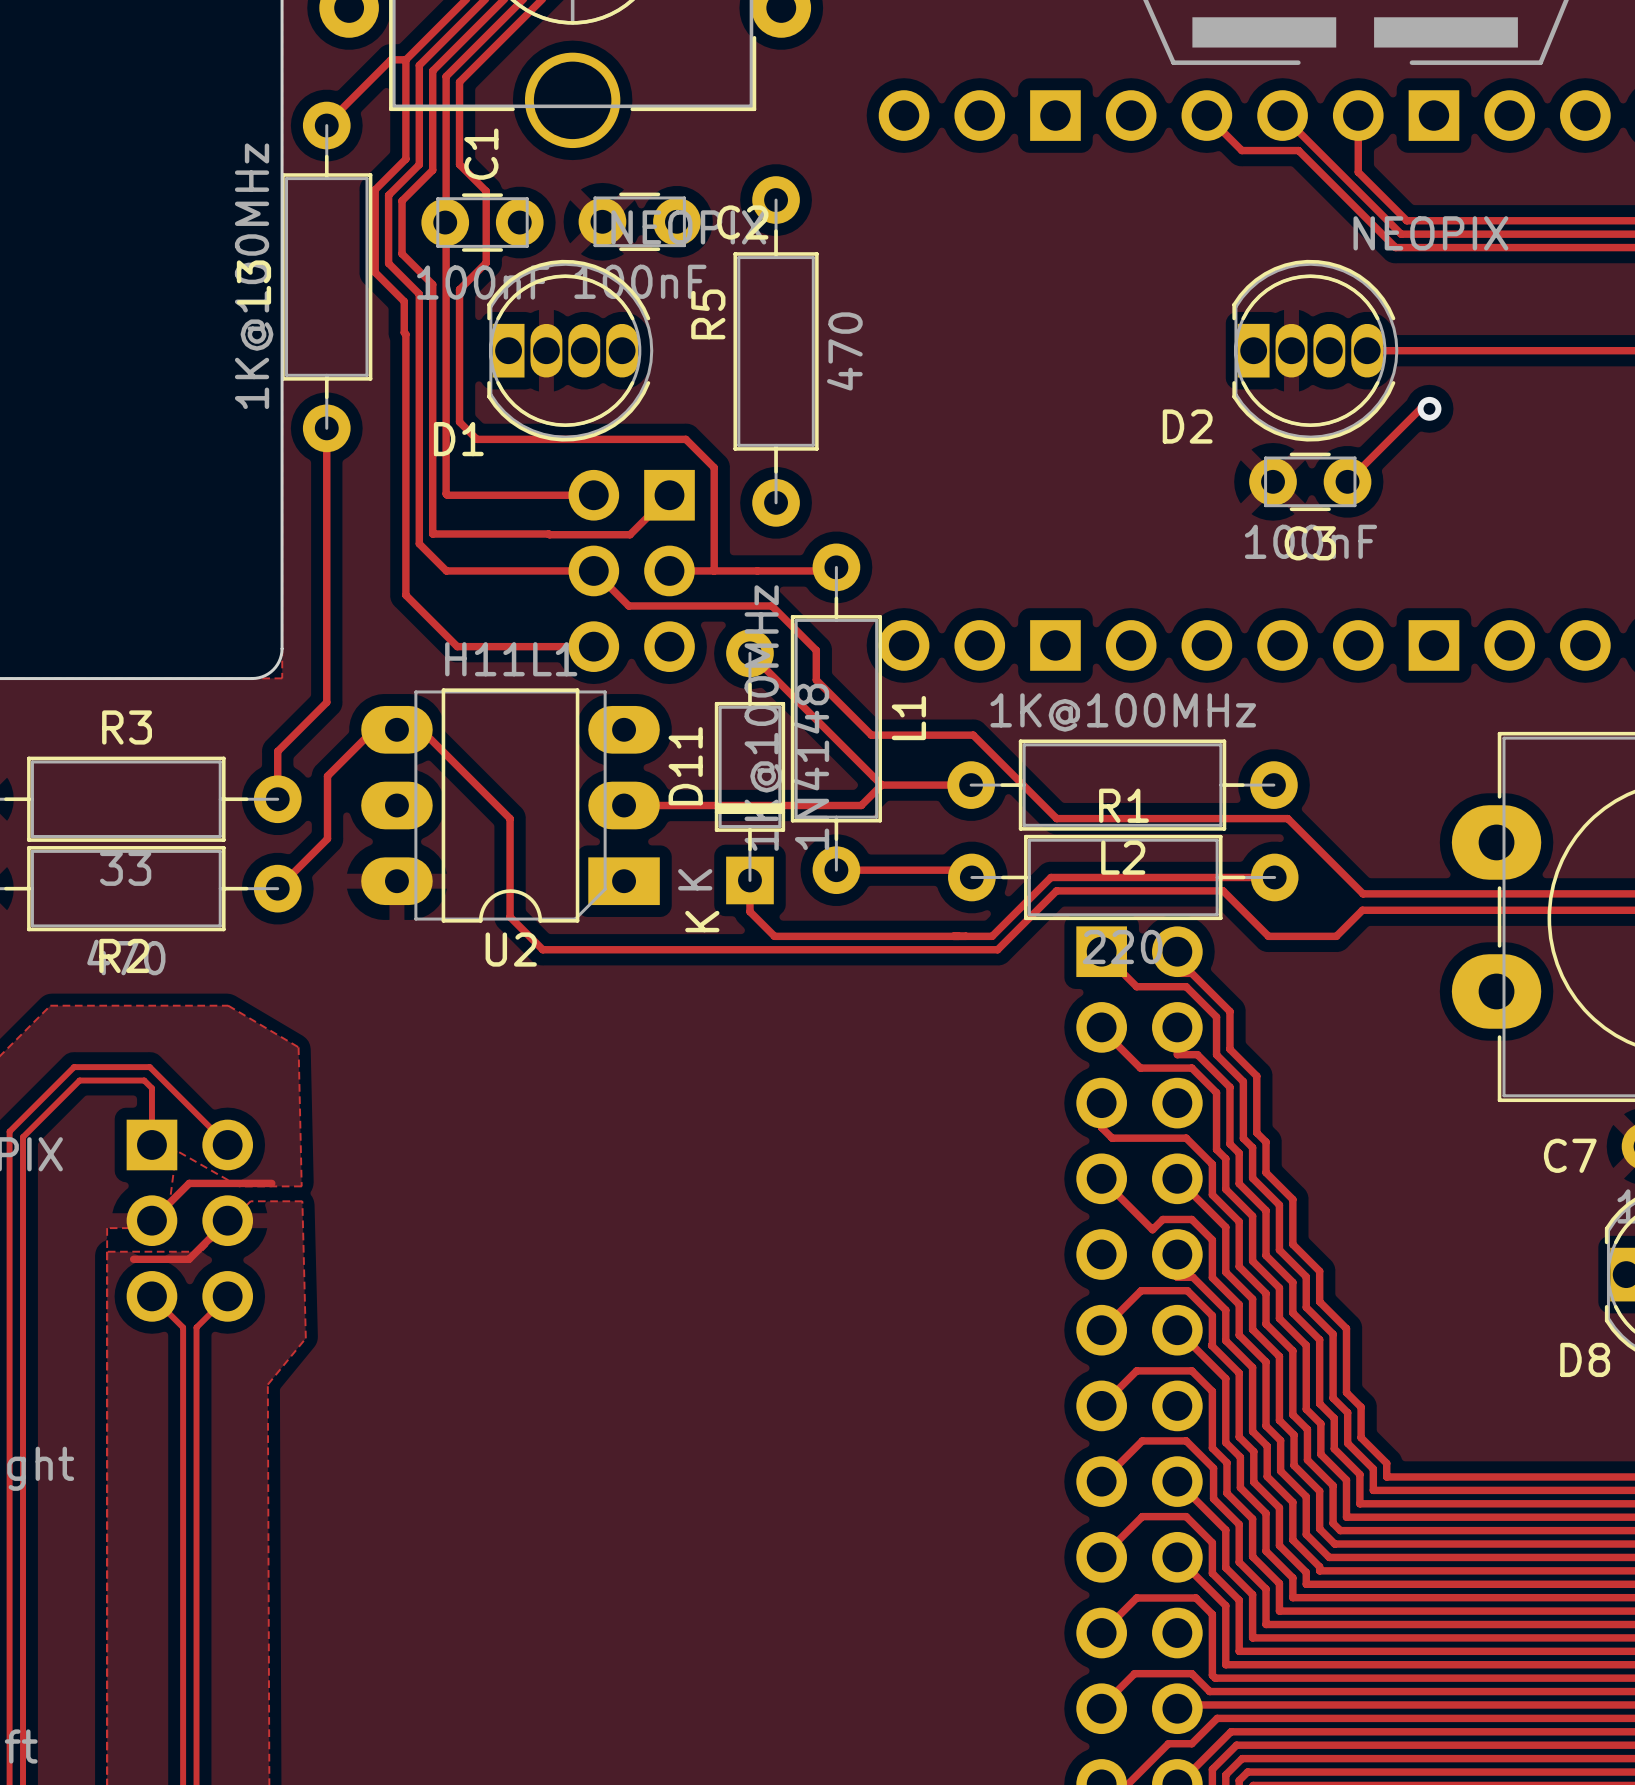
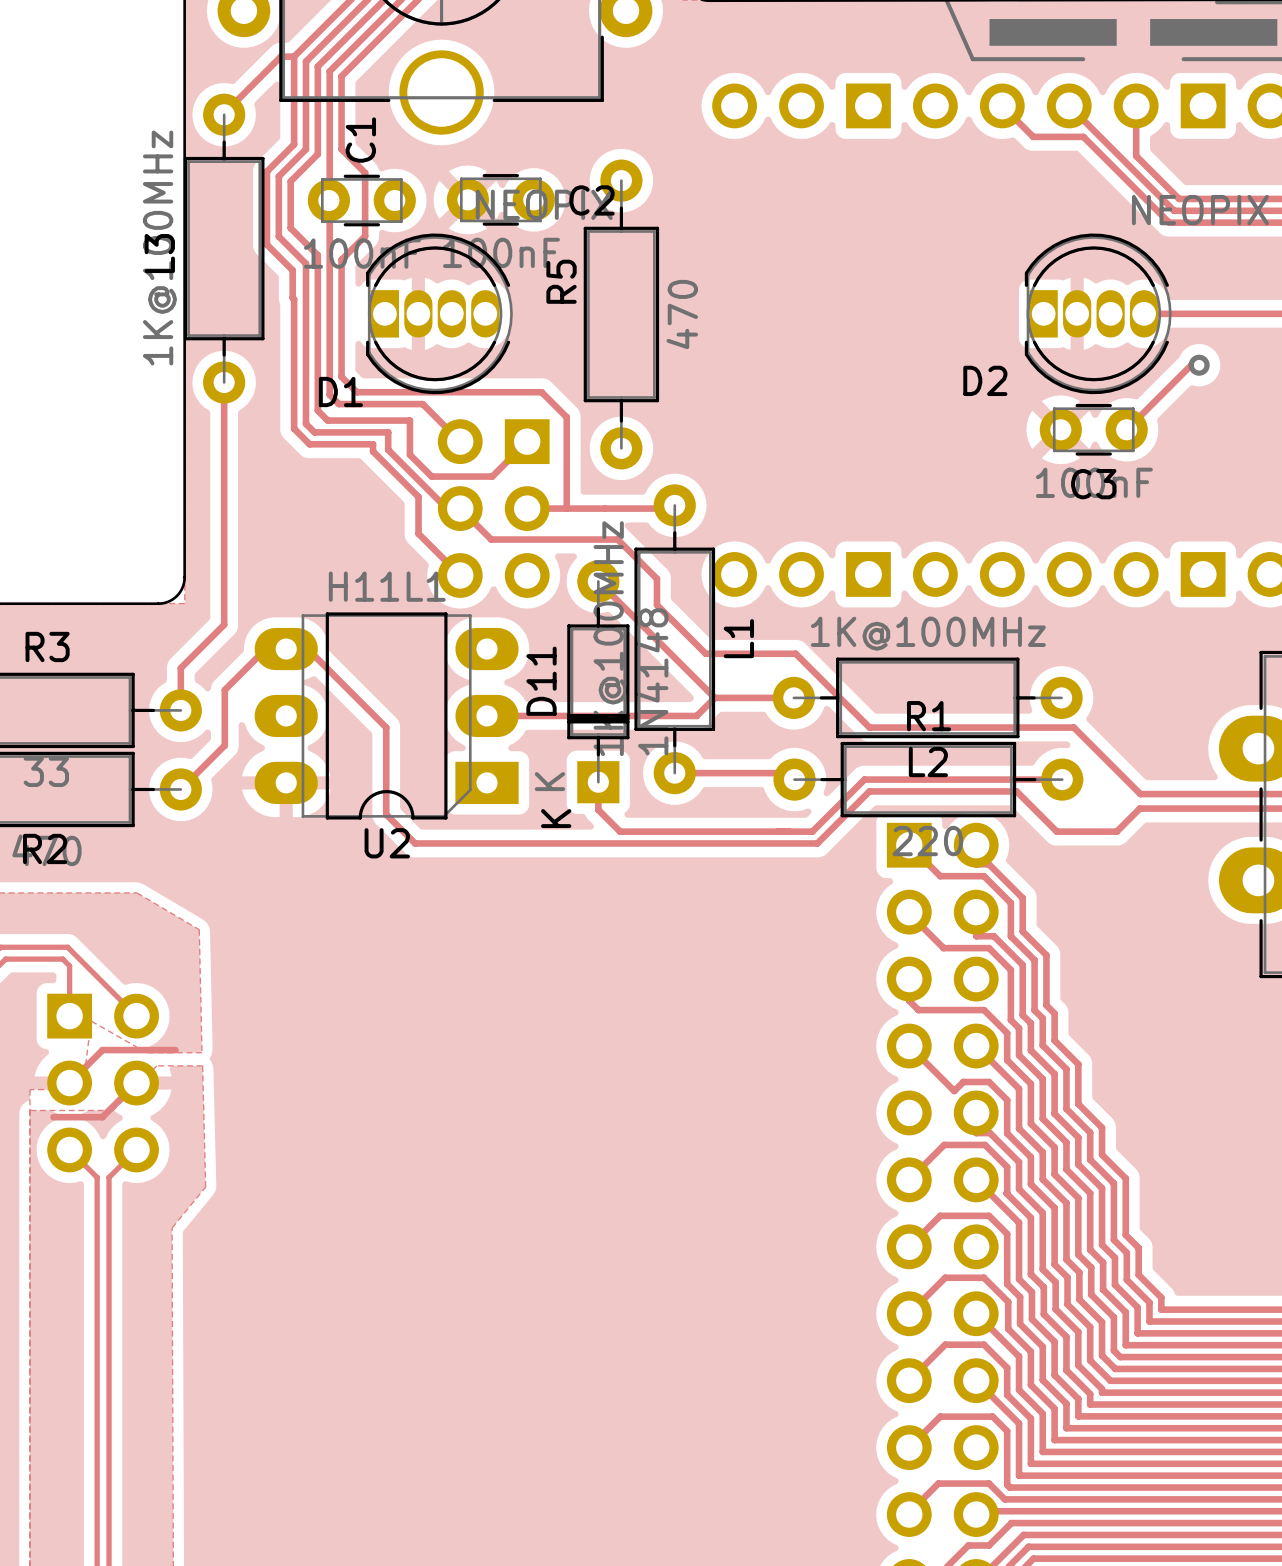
track: (446, 442) (447, 495) (593, 495) -> (329, 394) (338, 404) (422, 404) (460, 441)
track: (432, 460) (432, 533) (561, 534) -> (317, 410) (327, 420) (409, 420) (409, 454) (431, 476)
track: (419, 475) (419, 543) (446, 570) (578, 570) -> (305, 423) (314, 432) (388, 432) (388, 449) (446, 508)
track: (405, 480) (405, 595) (457, 646) (593, 646) -> (294, 428) (309, 444) (373, 444) (373, 451) (418, 496) (418, 533) (460, 575)

